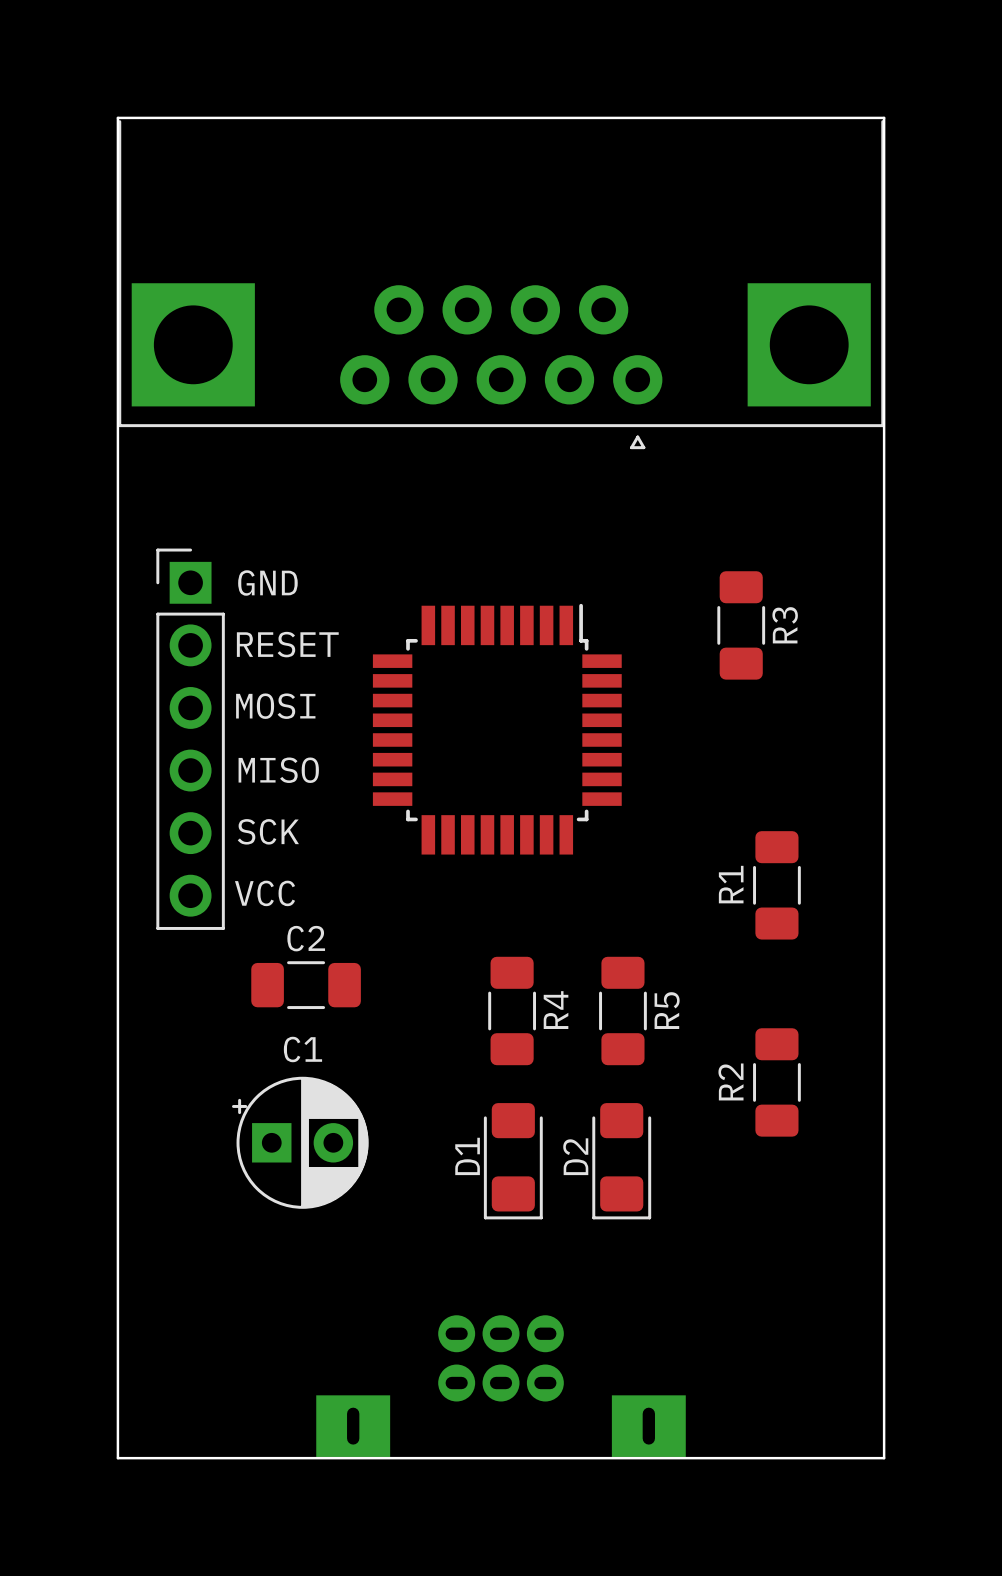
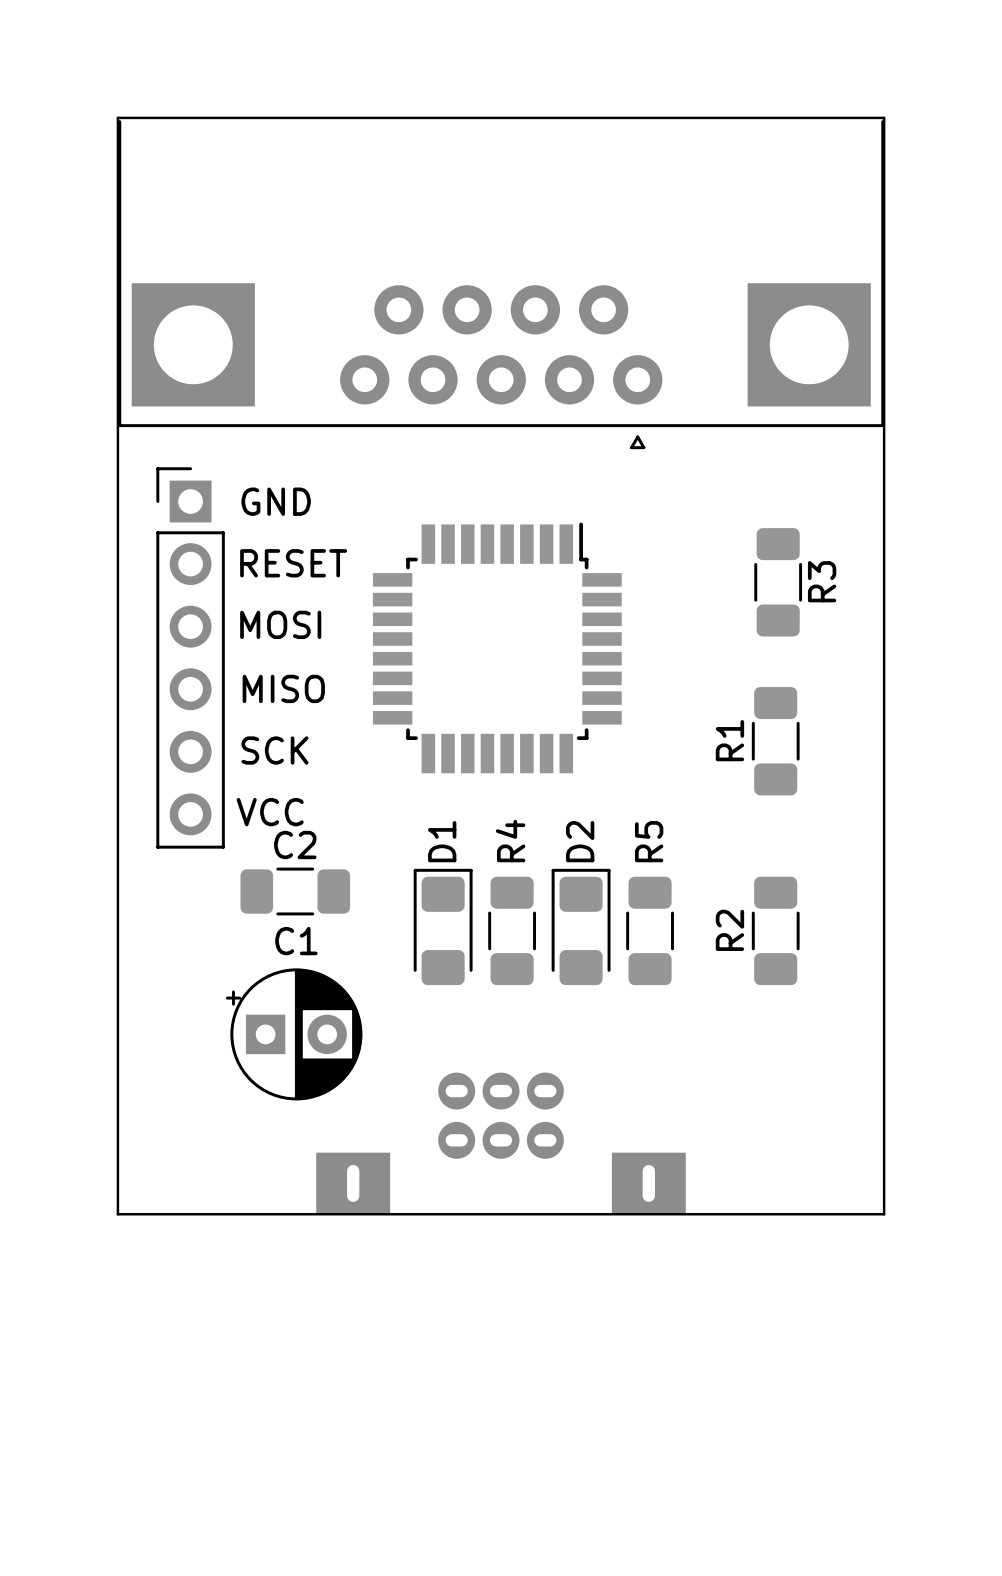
text position: GND (267, 582) -> GND (276, 501)
R3 position: (741, 625) -> (778, 582)
text position: RESET (287, 644) -> RESET (293, 563)
text position: MOSI (275, 706) -> MOSI (280, 624)
part position: (497, 729) -> (497, 647)
part position: (190, 739) -> (190, 657)
text position: MISO (278, 770) -> MISO (283, 688)
text position: SCK (268, 831) -> SCK (274, 750)
R1 position: (776, 885) -> (775, 741)
text position: VCC (265, 893) -> VCC (270, 812)
C2 position: (306, 985) -> (295, 891)
R4 position: (512, 1010) -> (512, 930)
R4 name position: R4 (556, 1010) -> R4 (510, 841)
R5 position: (622, 1010) -> (650, 930)
R5 name position: R5 (667, 1010) -> R5 (649, 841)
R2 position: (776, 1082) -> (775, 930)
C1 position: (300, 1142) -> (294, 1034)
D1 name position: D1 (467, 1156) -> D1 (442, 841)
D2 name position: D2 (575, 1156) -> D2 (580, 841)
D1 rotation: 0° (513, 1161) -> 180° (443, 926)
D1 position: (513, 1161) -> (443, 926)
D2 rotation: 0° (621, 1161) -> 180° (581, 926)
D2 position: (621, 1161) -> (581, 926)
board edge: (117, 1214) (117, 1458) (884, 1458) (884, 1214) -> (117, 1214) (884, 1214)
part position: (501, 1386) -> (501, 1143)

